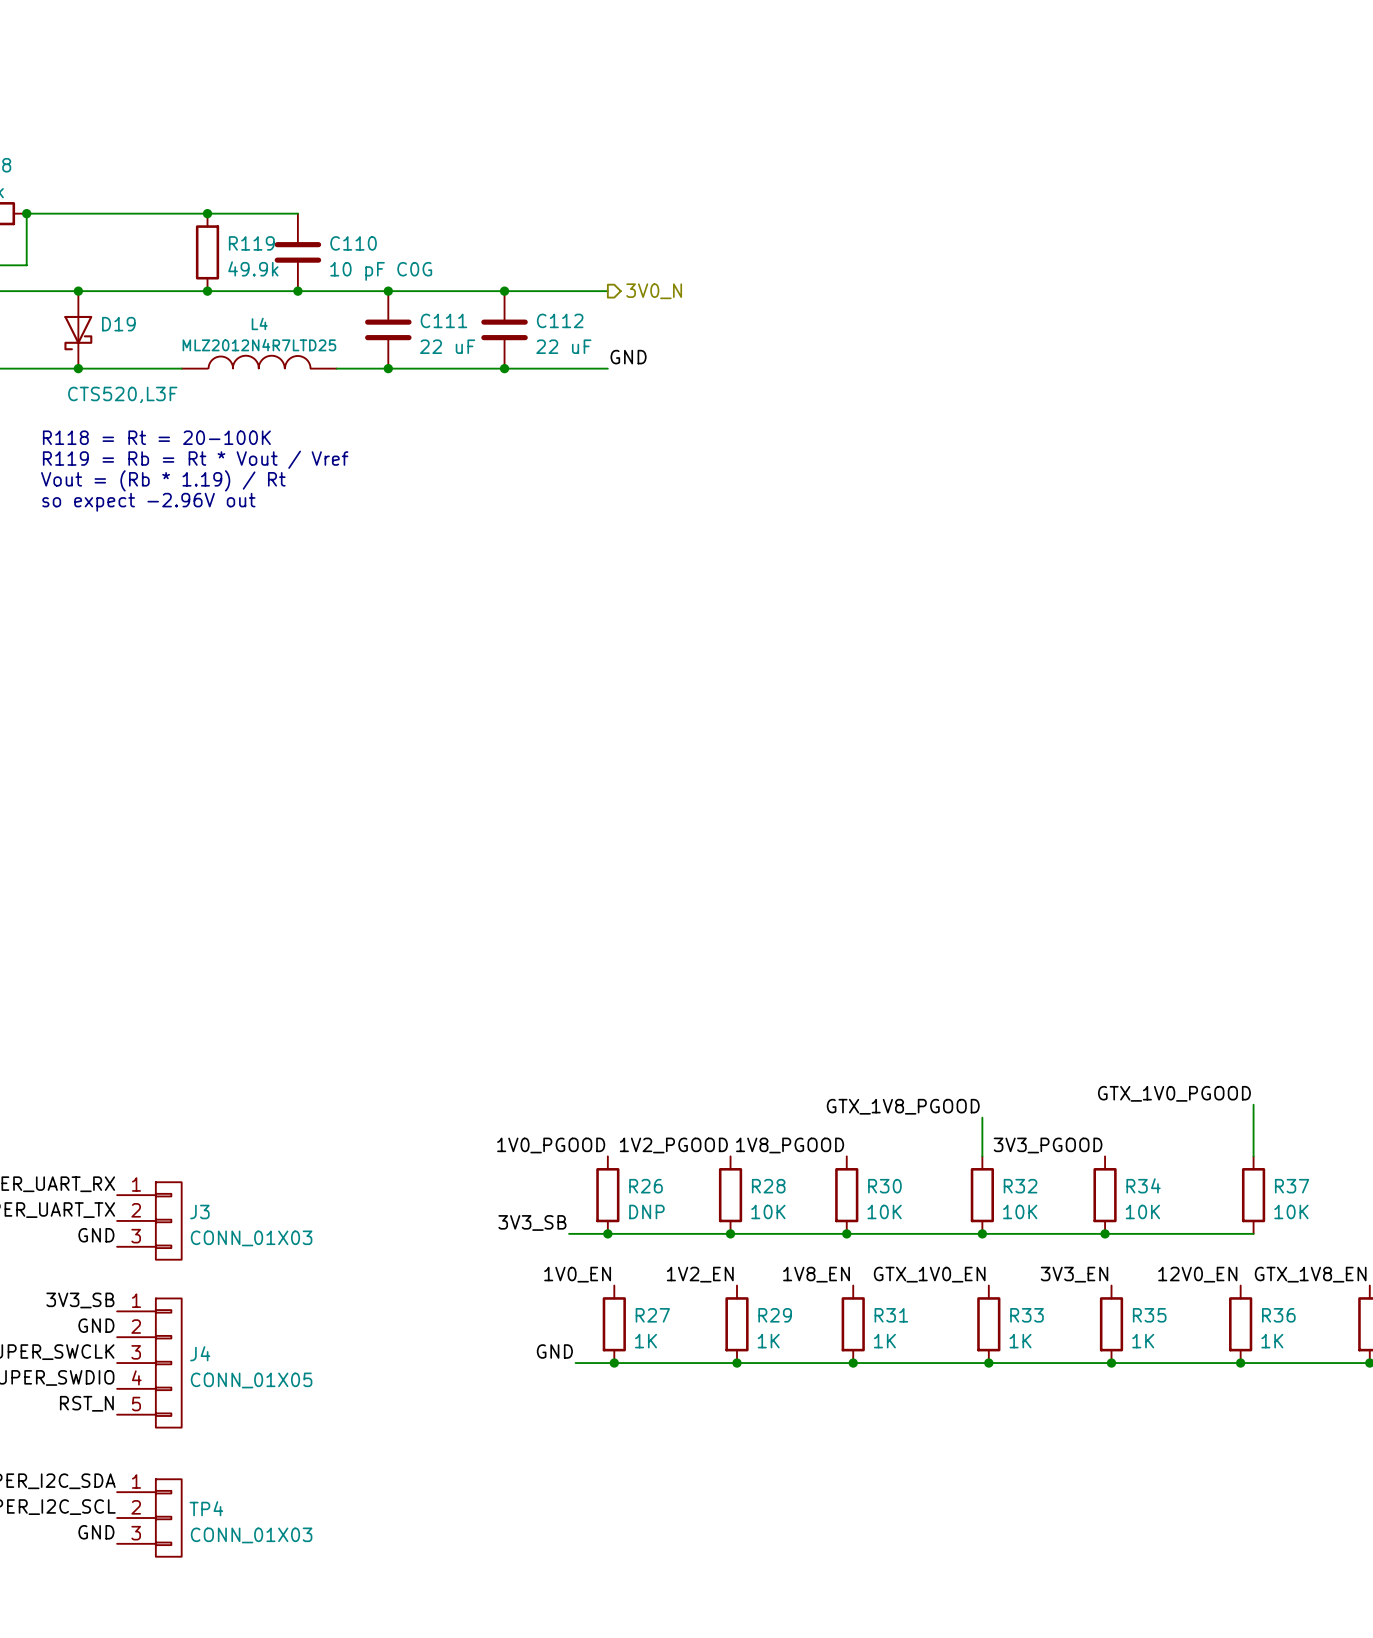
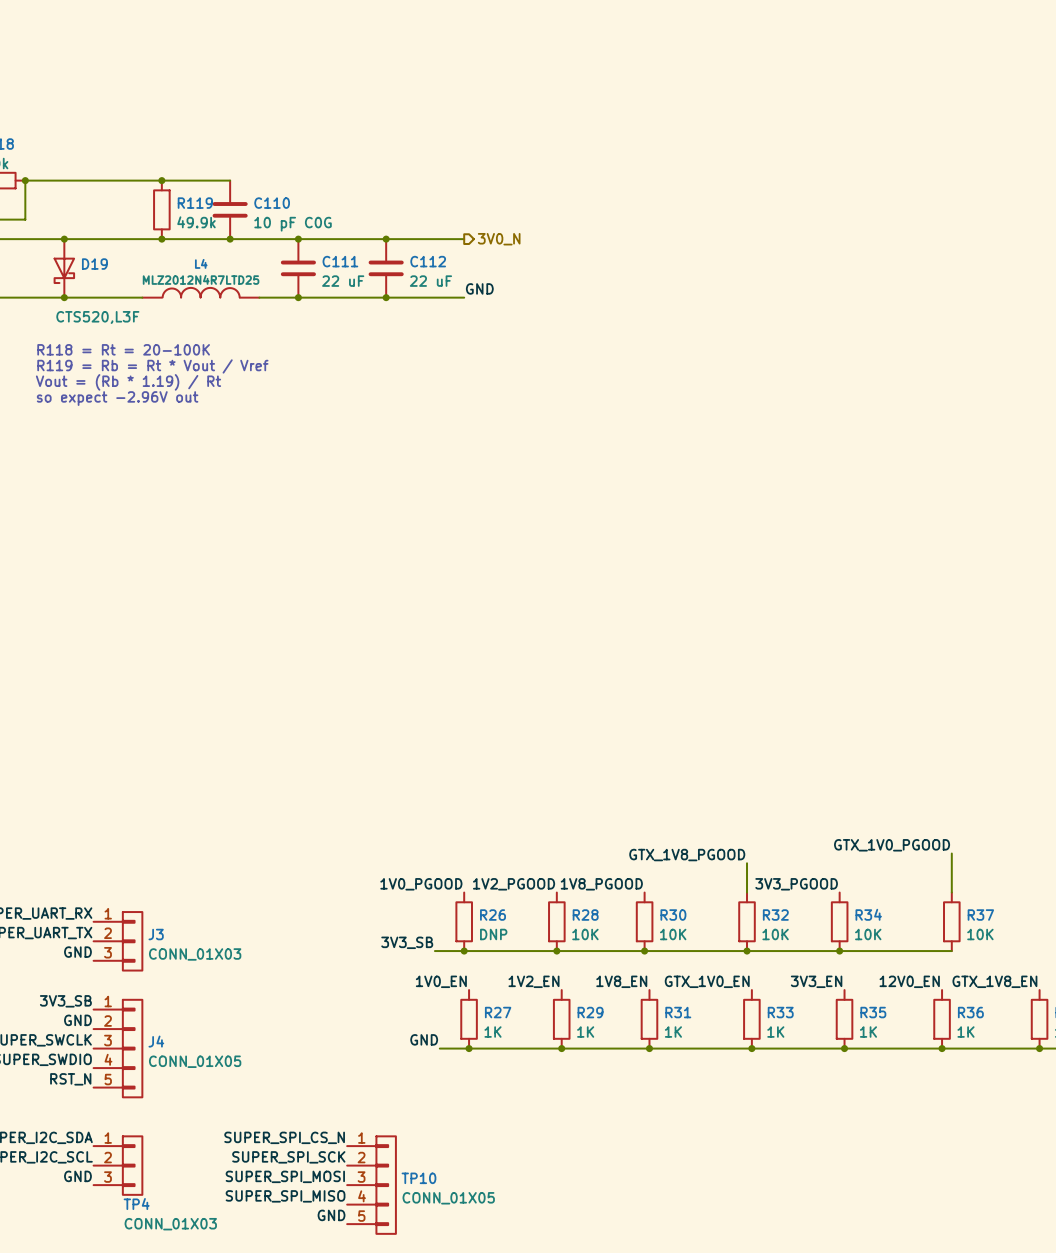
label: none -> SUPER_SPI_CS_N (284, 1137)
label: none -> SUPER_SPI_SCK (288, 1157)
TP4 name position: TP4 (206, 1508) -> TP4 (136, 1204)
label: none -> SUPER_SPI_MOSI (285, 1176)
TP4 value position: CONN_01X03 (251, 1535) -> CONN_01X03 (170, 1224)
TP10: none -> CONN_01X05 (371, 1185)
label: none -> SUPER_SPI_MISO (285, 1196)
label: none -> GND (331, 1215)

